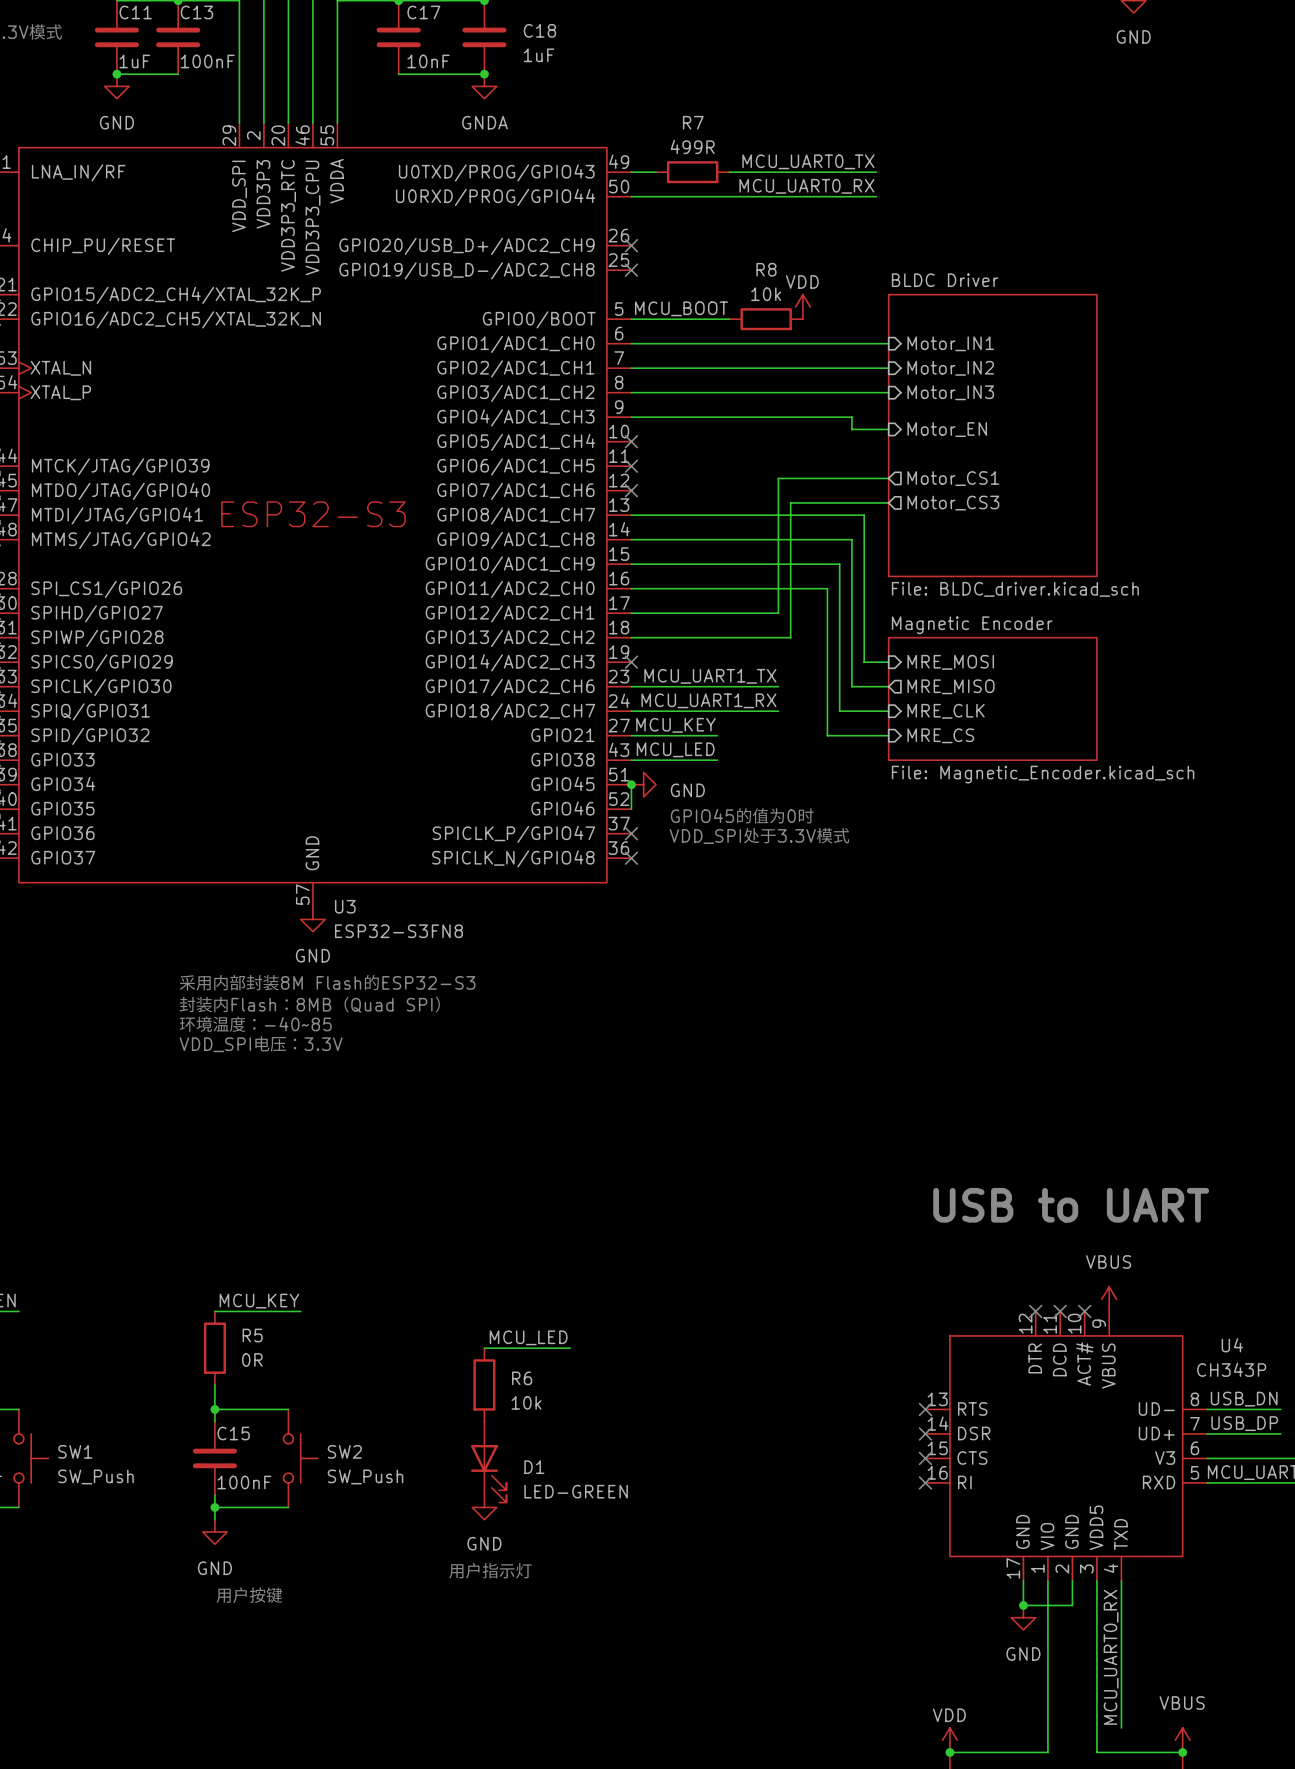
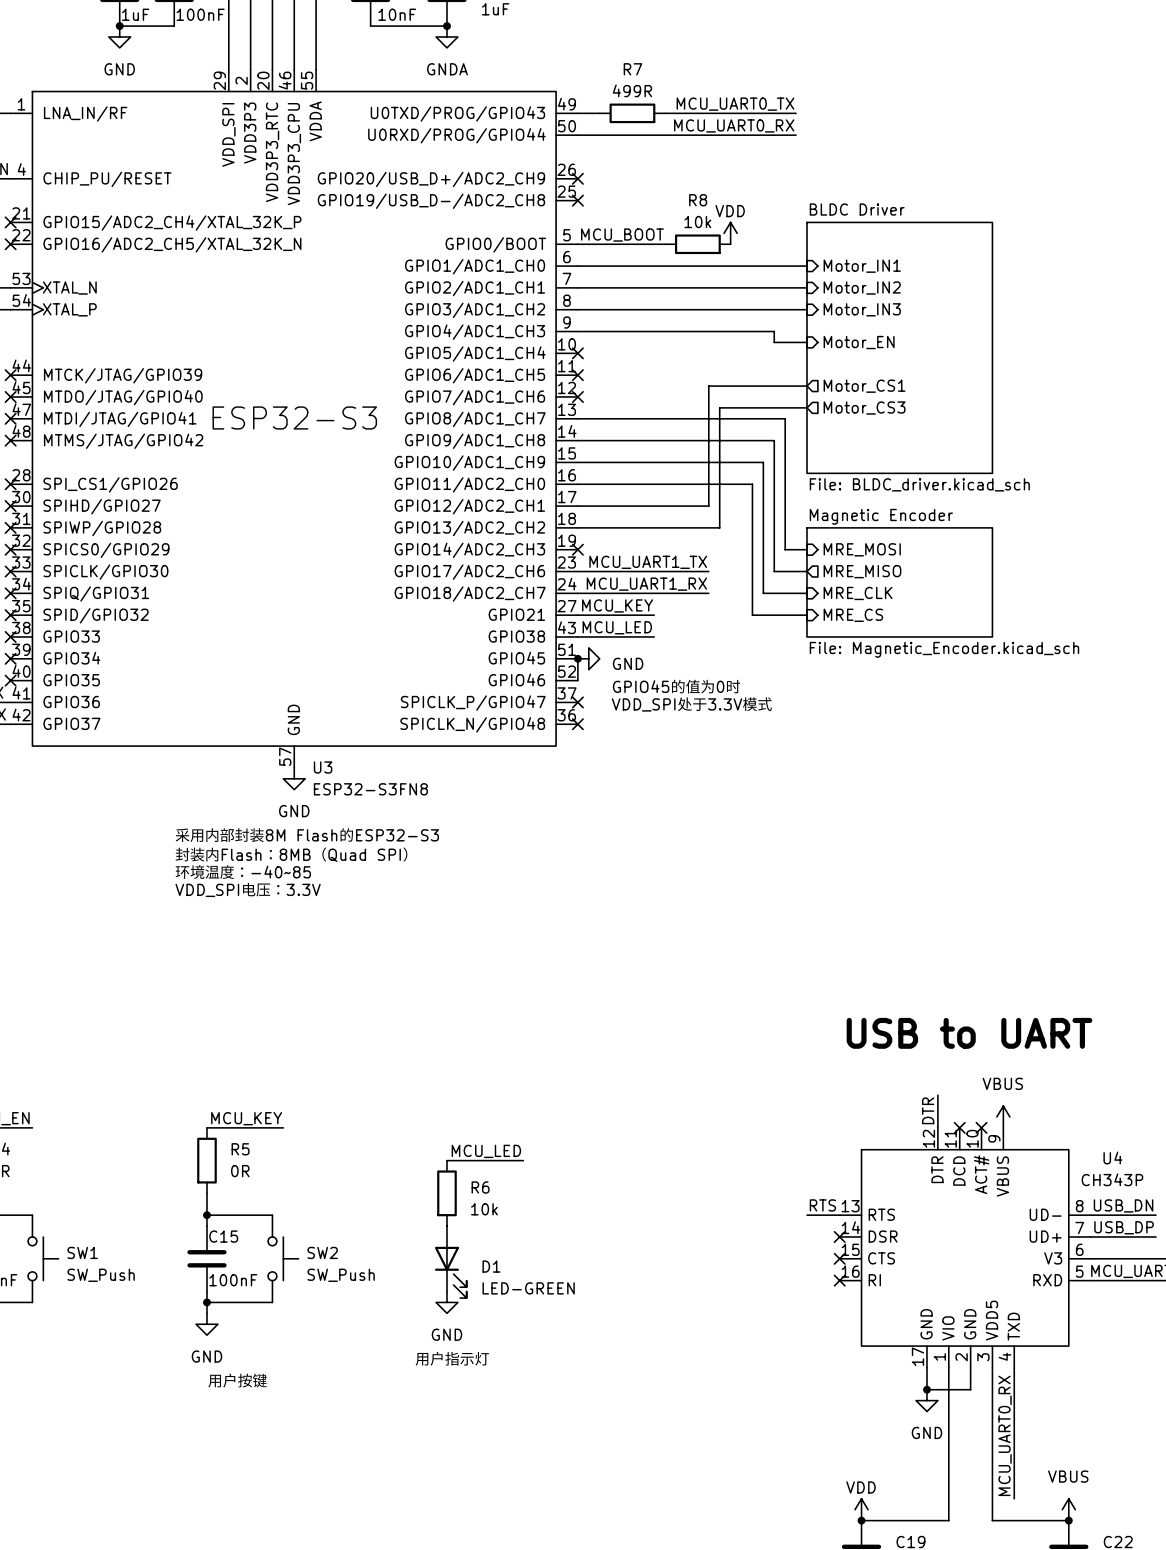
wire: none -> (937, 1095) (937, 1127)
label: none -> DTR (928, 1110)
no-connect mark: (1035, 1311) -> none
label: none -> RTS (822, 1205)
wire: none -> (806, 1215) (839, 1215)
no-connect mark: (925, 1409) -> none

